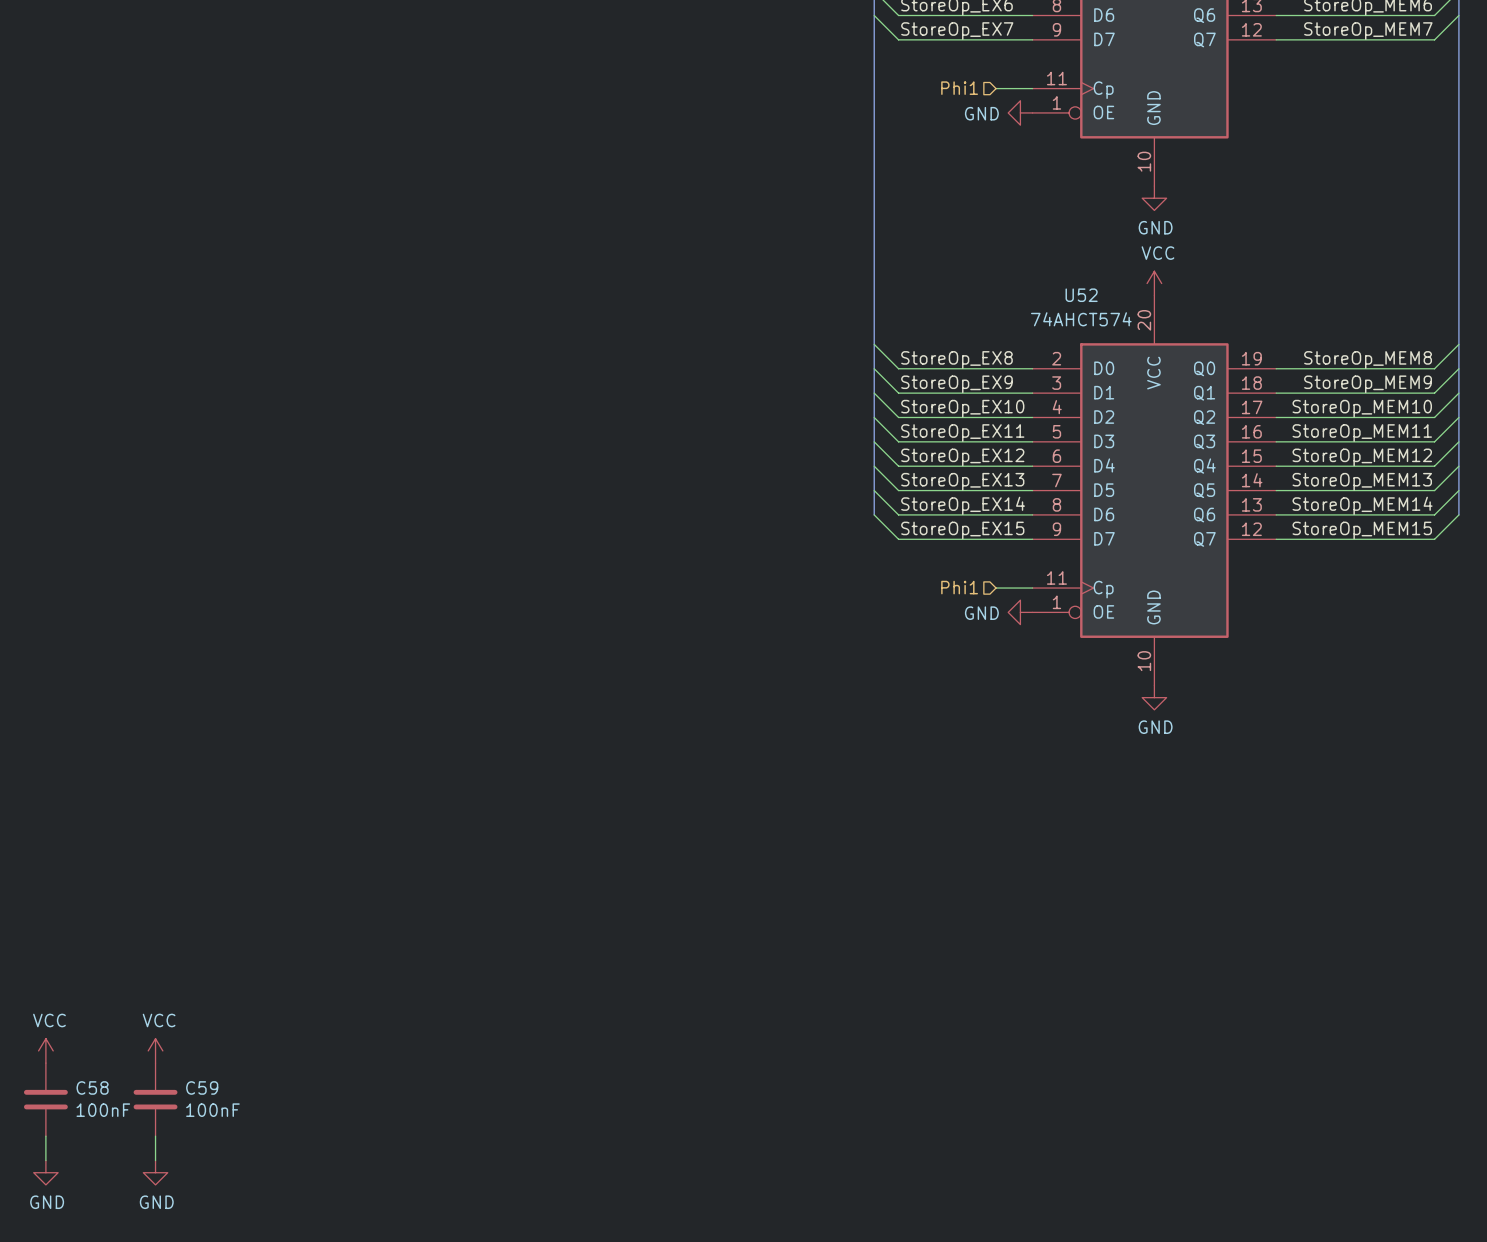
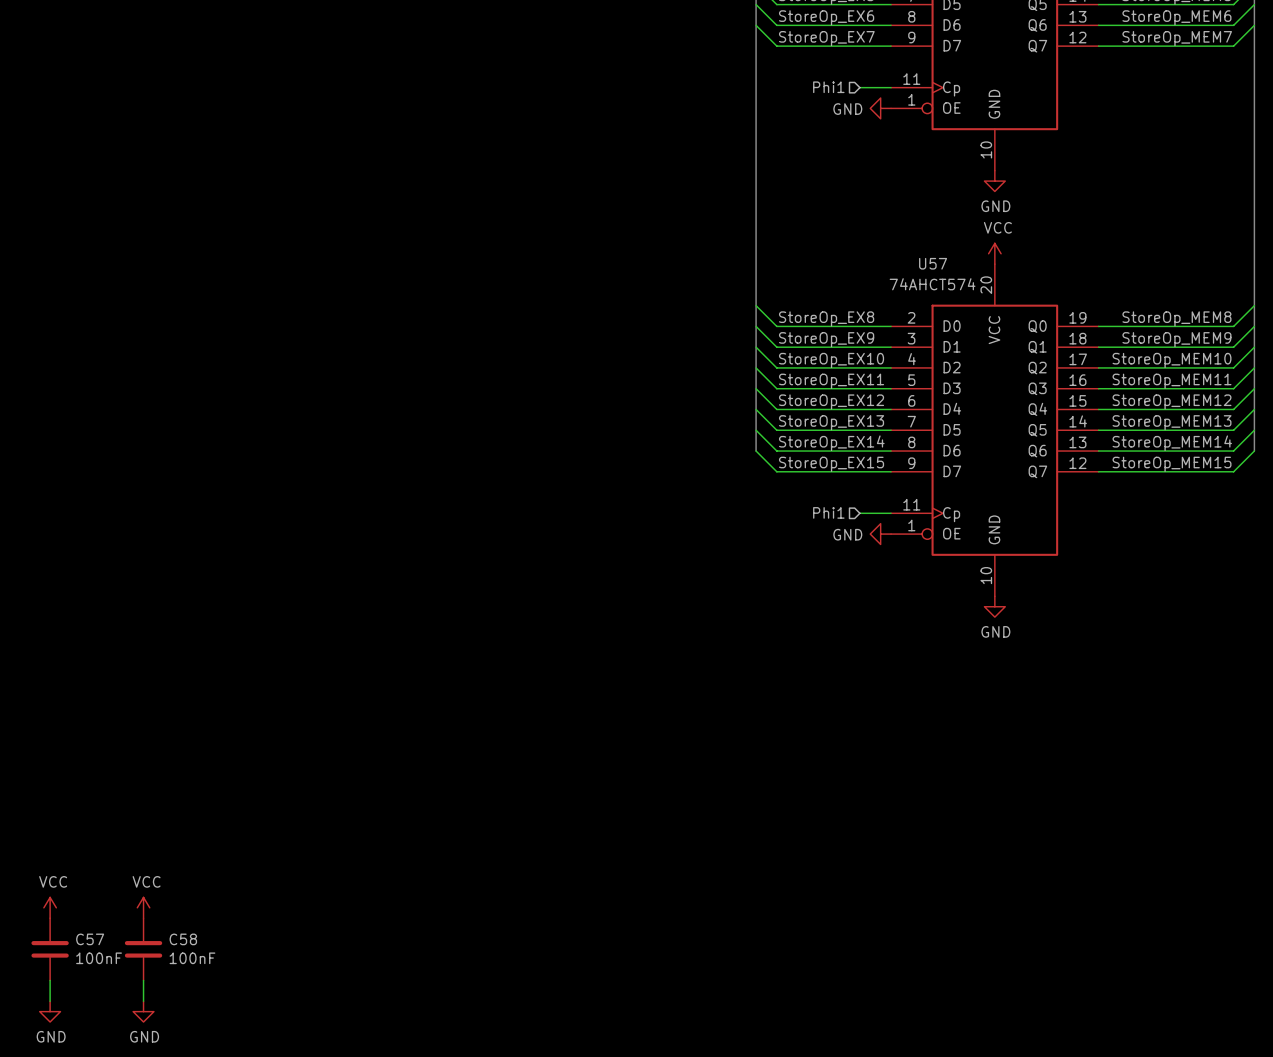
U52 name: U52 (1081, 295) -> U57 (933, 263)
C58 name: C58 (92, 1087) -> C57 (90, 939)
C59 name: C59 (202, 1087) -> C58 (183, 939)

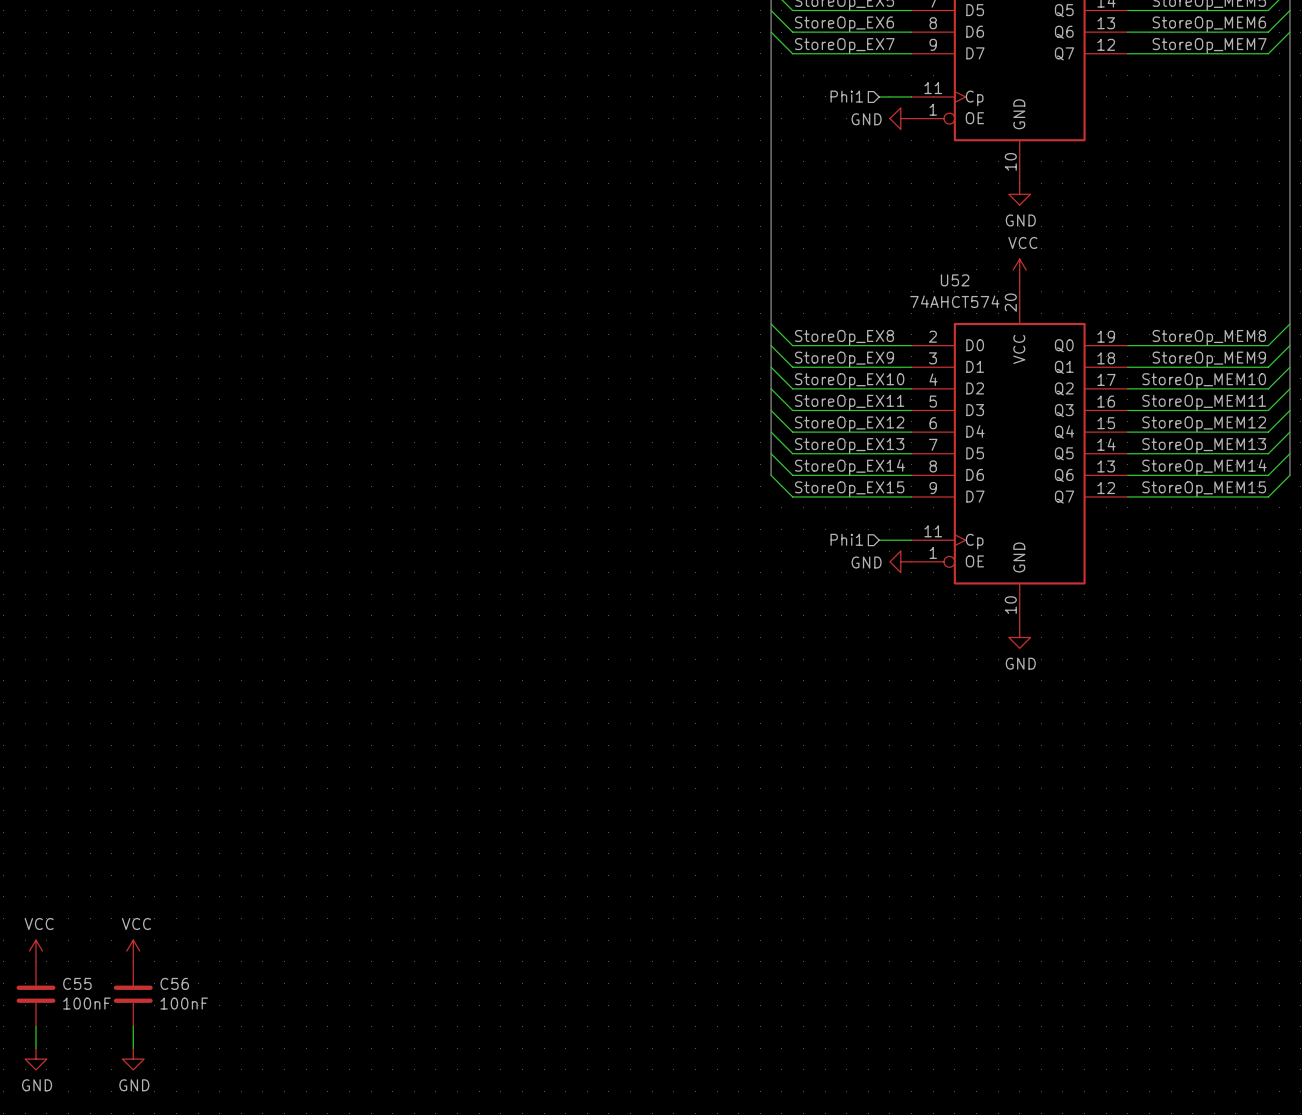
U57 name: U57 (933, 263) -> U52 (955, 280)
C57 name: C57 (90, 939) -> C55 (77, 983)
C58 name: C58 (183, 939) -> C56 (174, 983)

